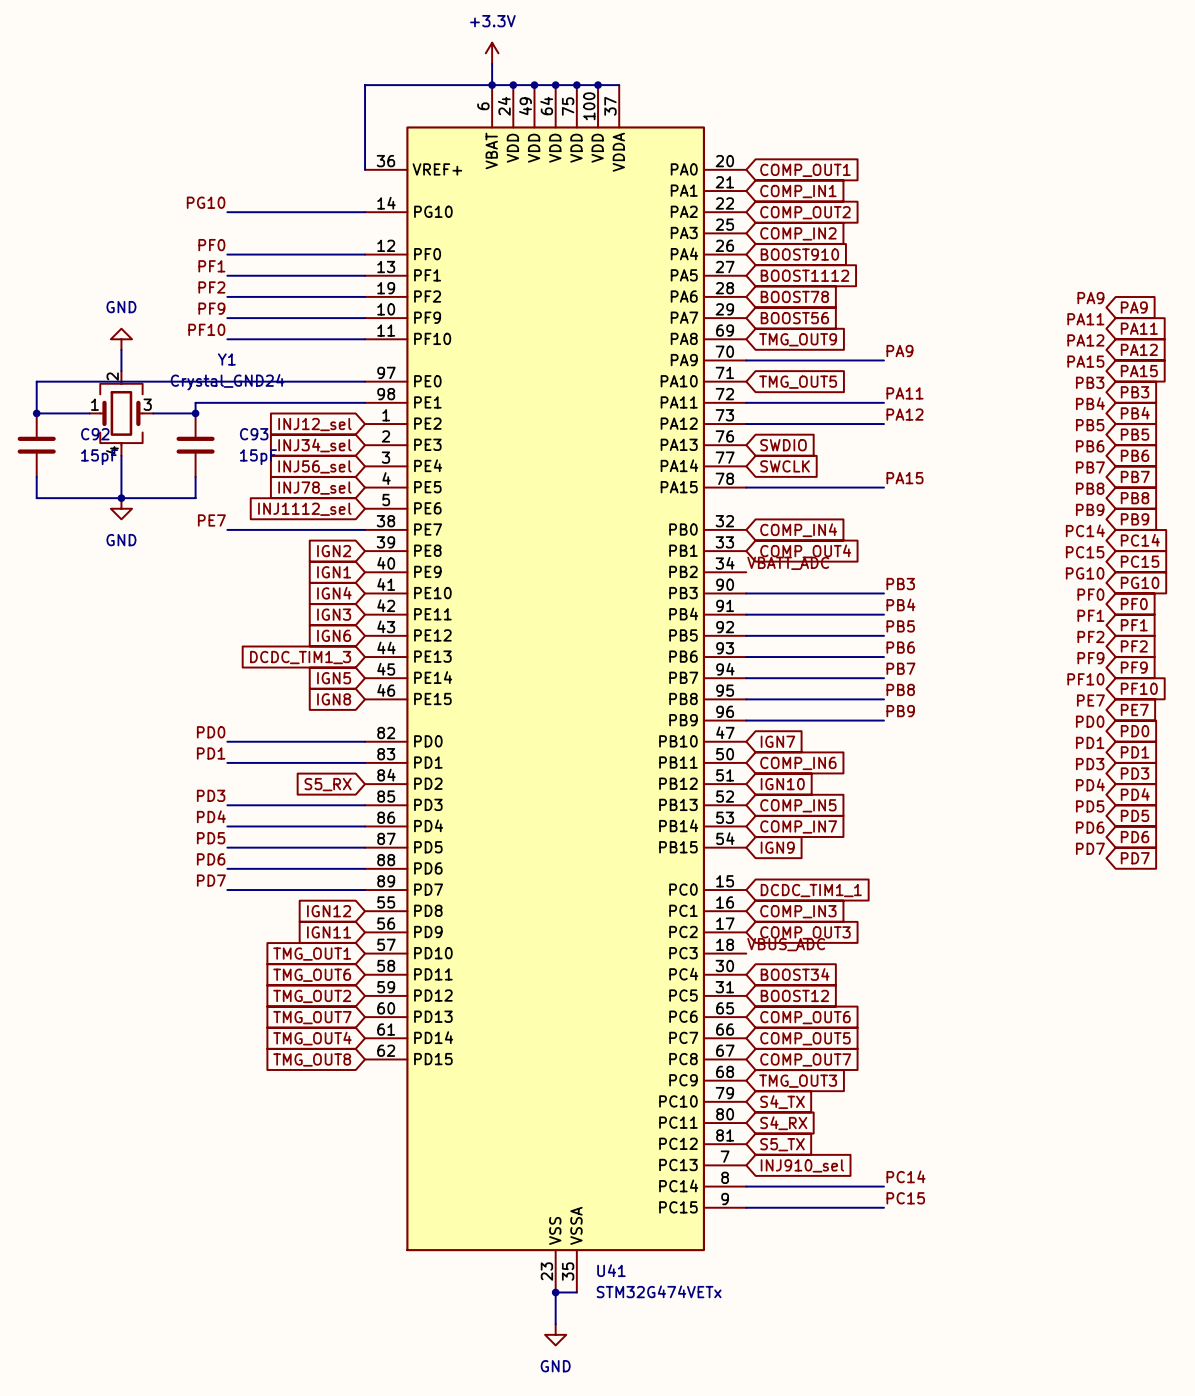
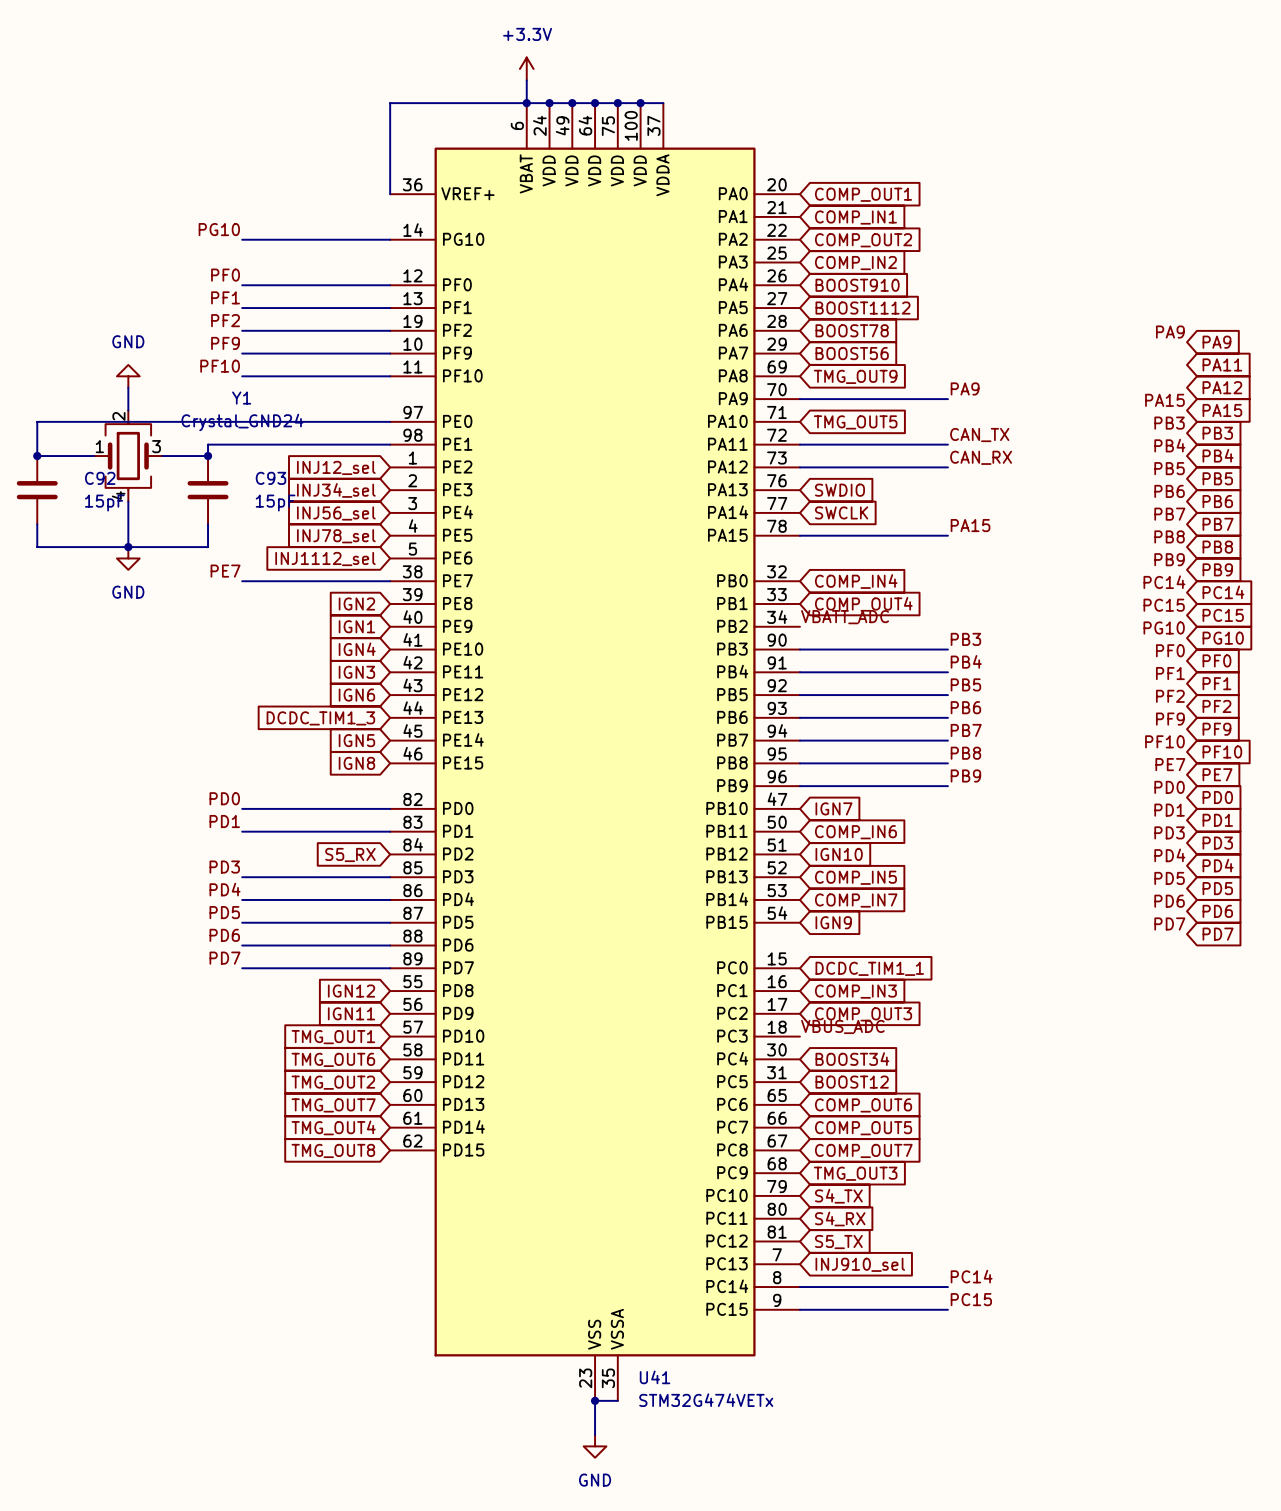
label: PA11 (1085, 319) -> none
label: PA12 (1085, 340) -> none
label: PA11 (905, 393) -> CAN_TX (979, 435)
label: PA12 (905, 414) -> CAN_RX (981, 457)

